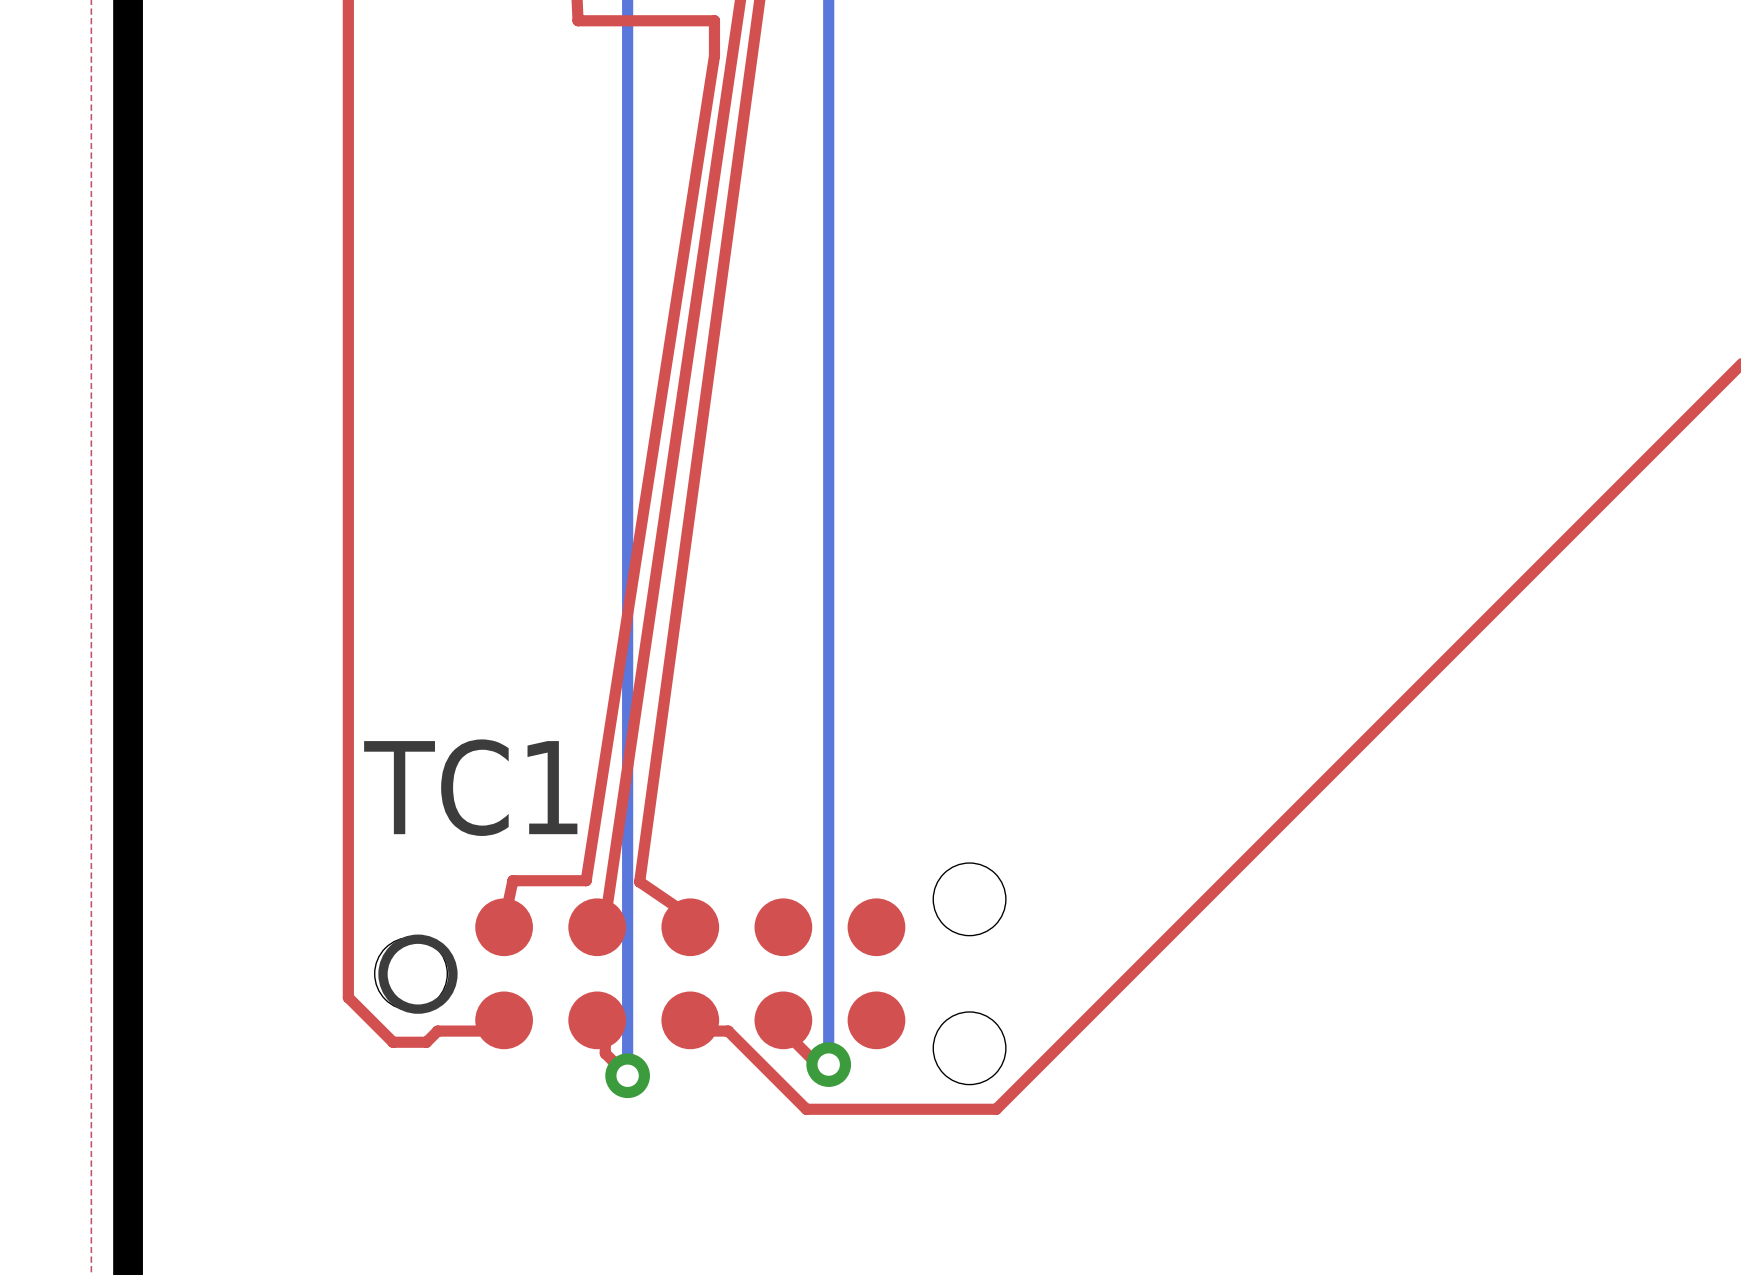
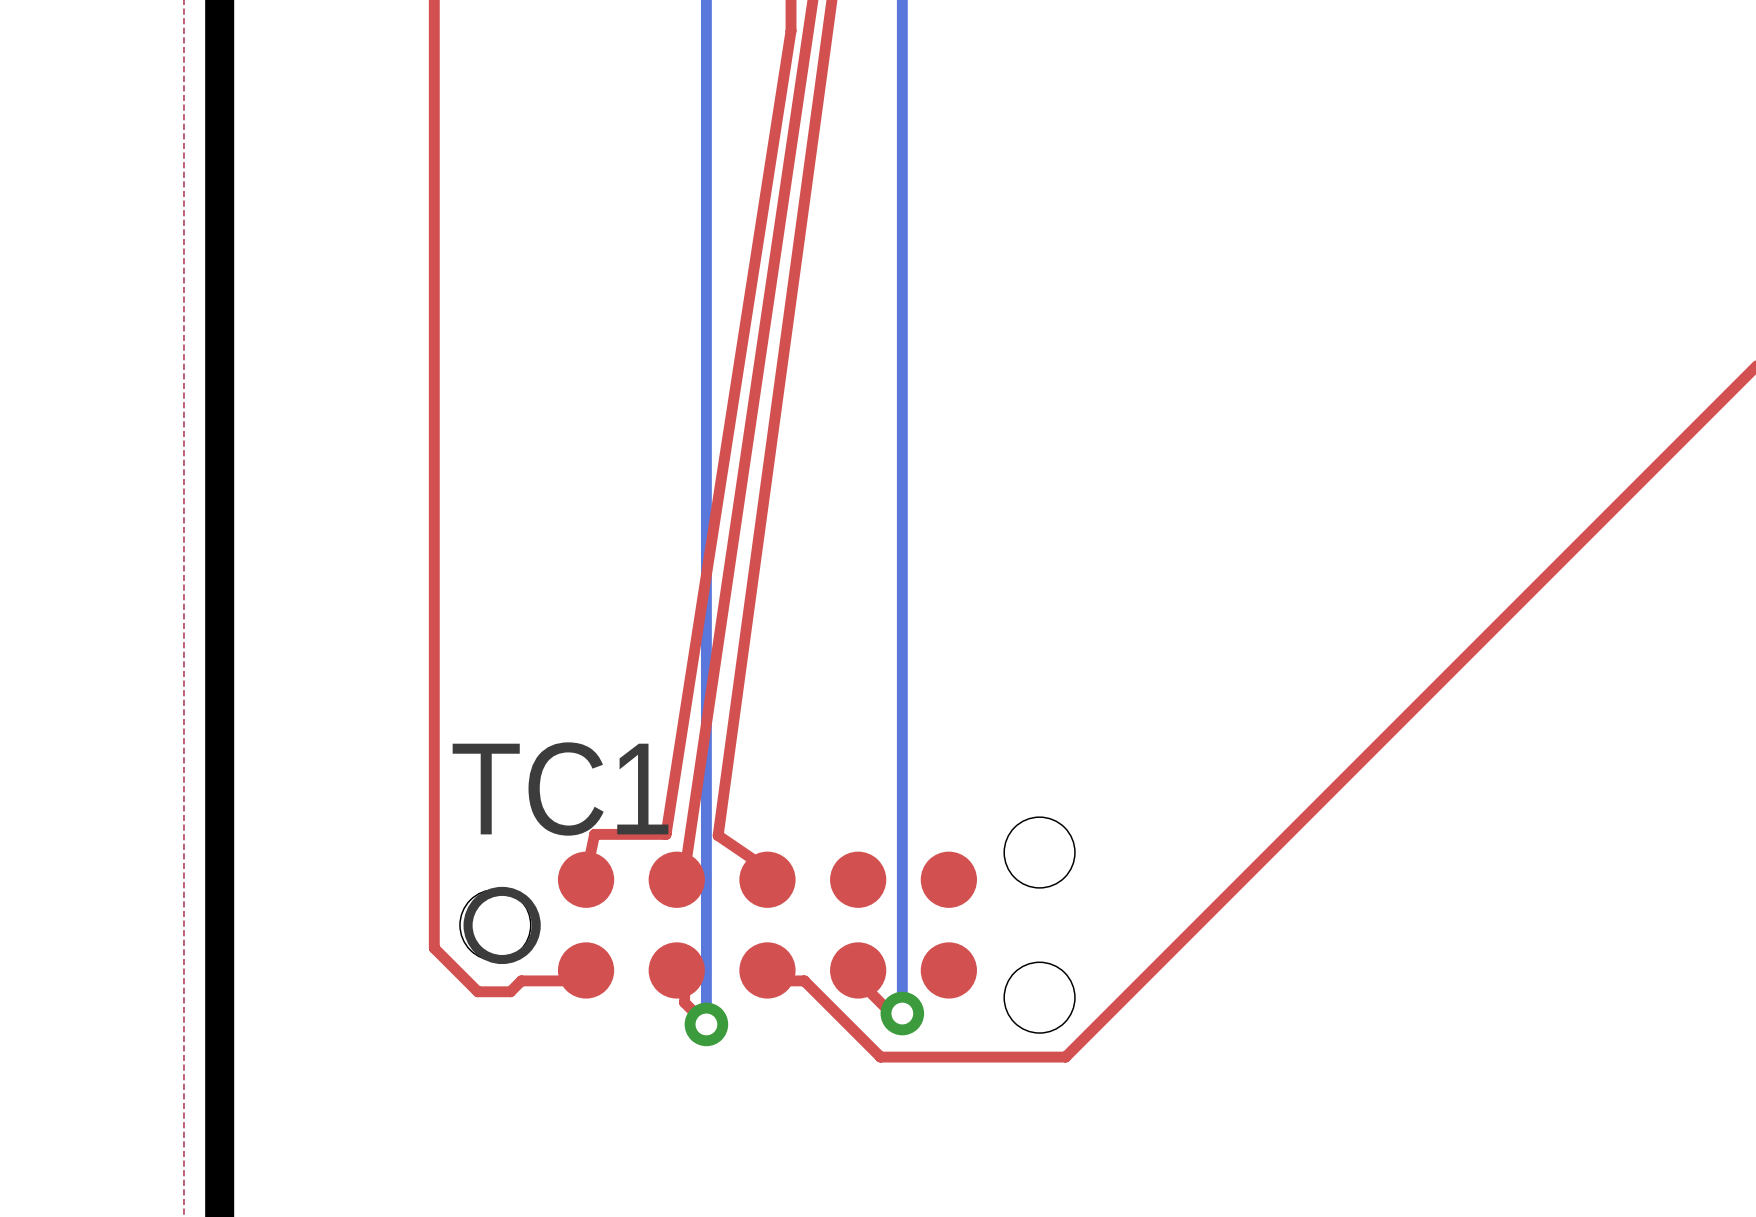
TC1 name position: TC1 (470, 787) -> TC1 (560, 789)

